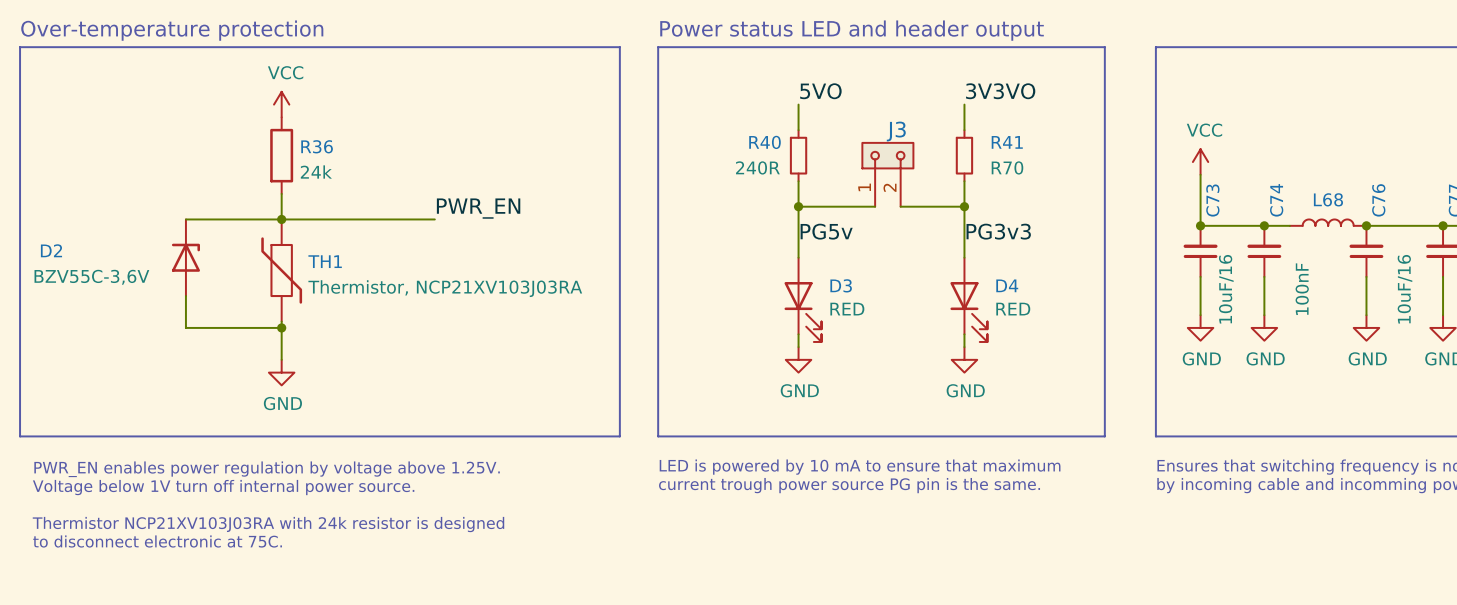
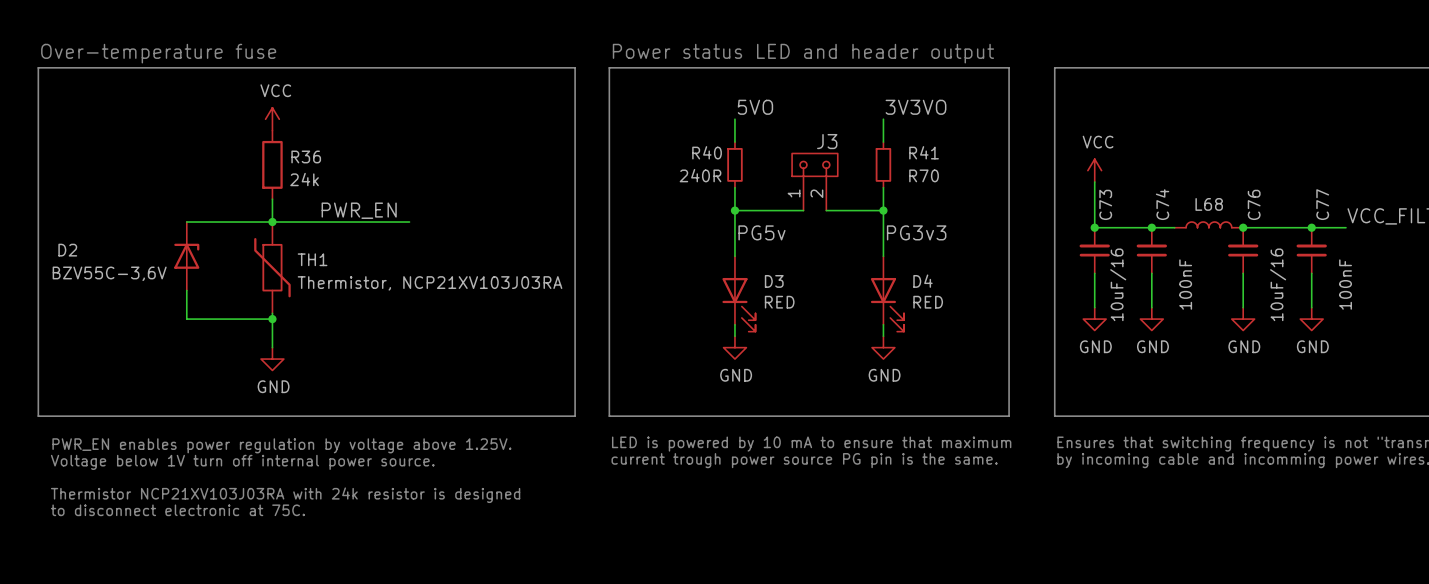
text: Over-temperature protection (172, 30) -> Over-temperature fuse (158, 53)
label position: PWR_EN (478, 208) -> PWR_EN (359, 210)

